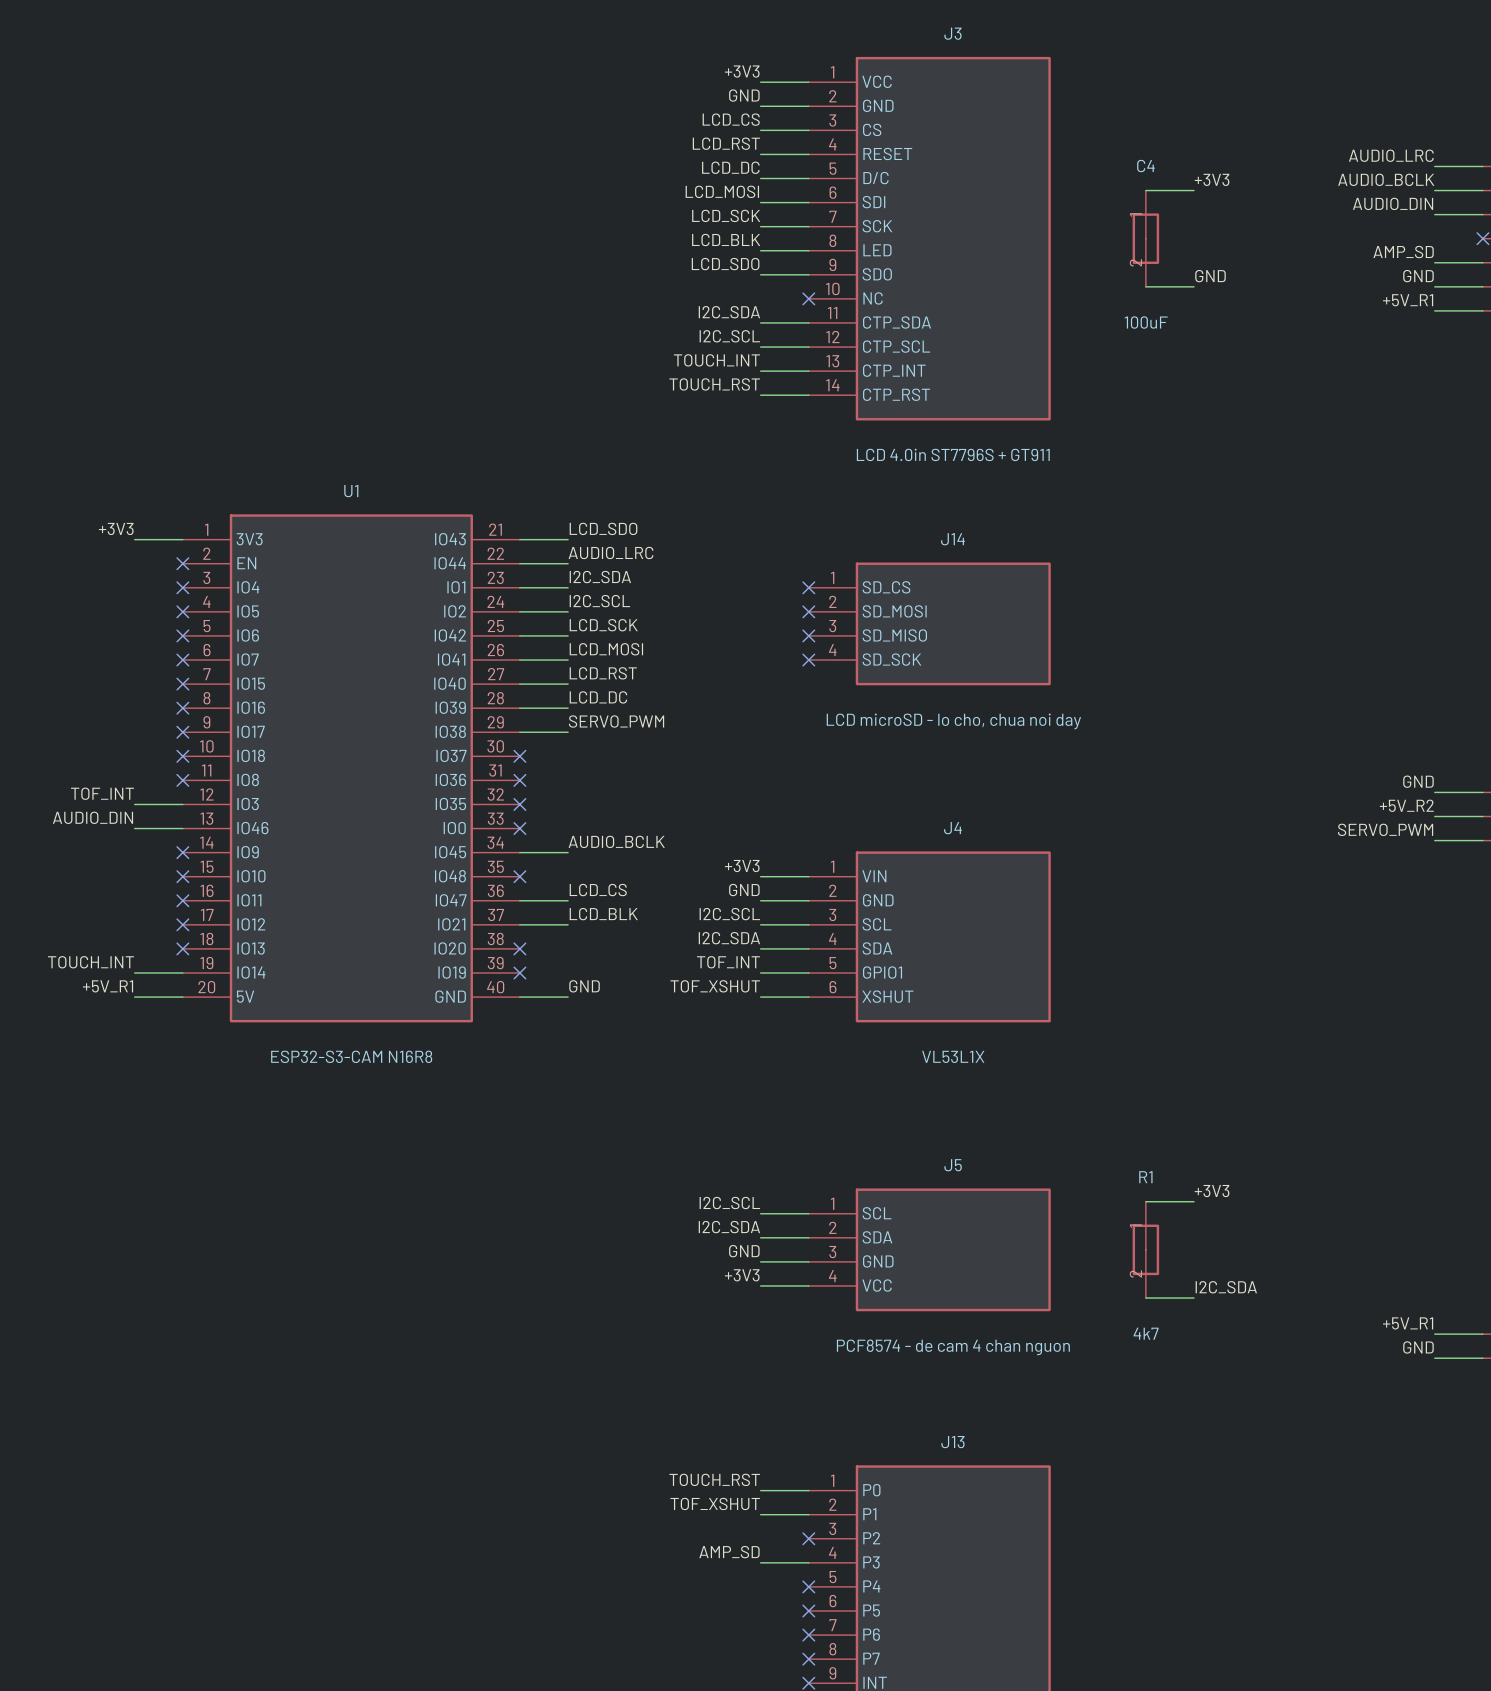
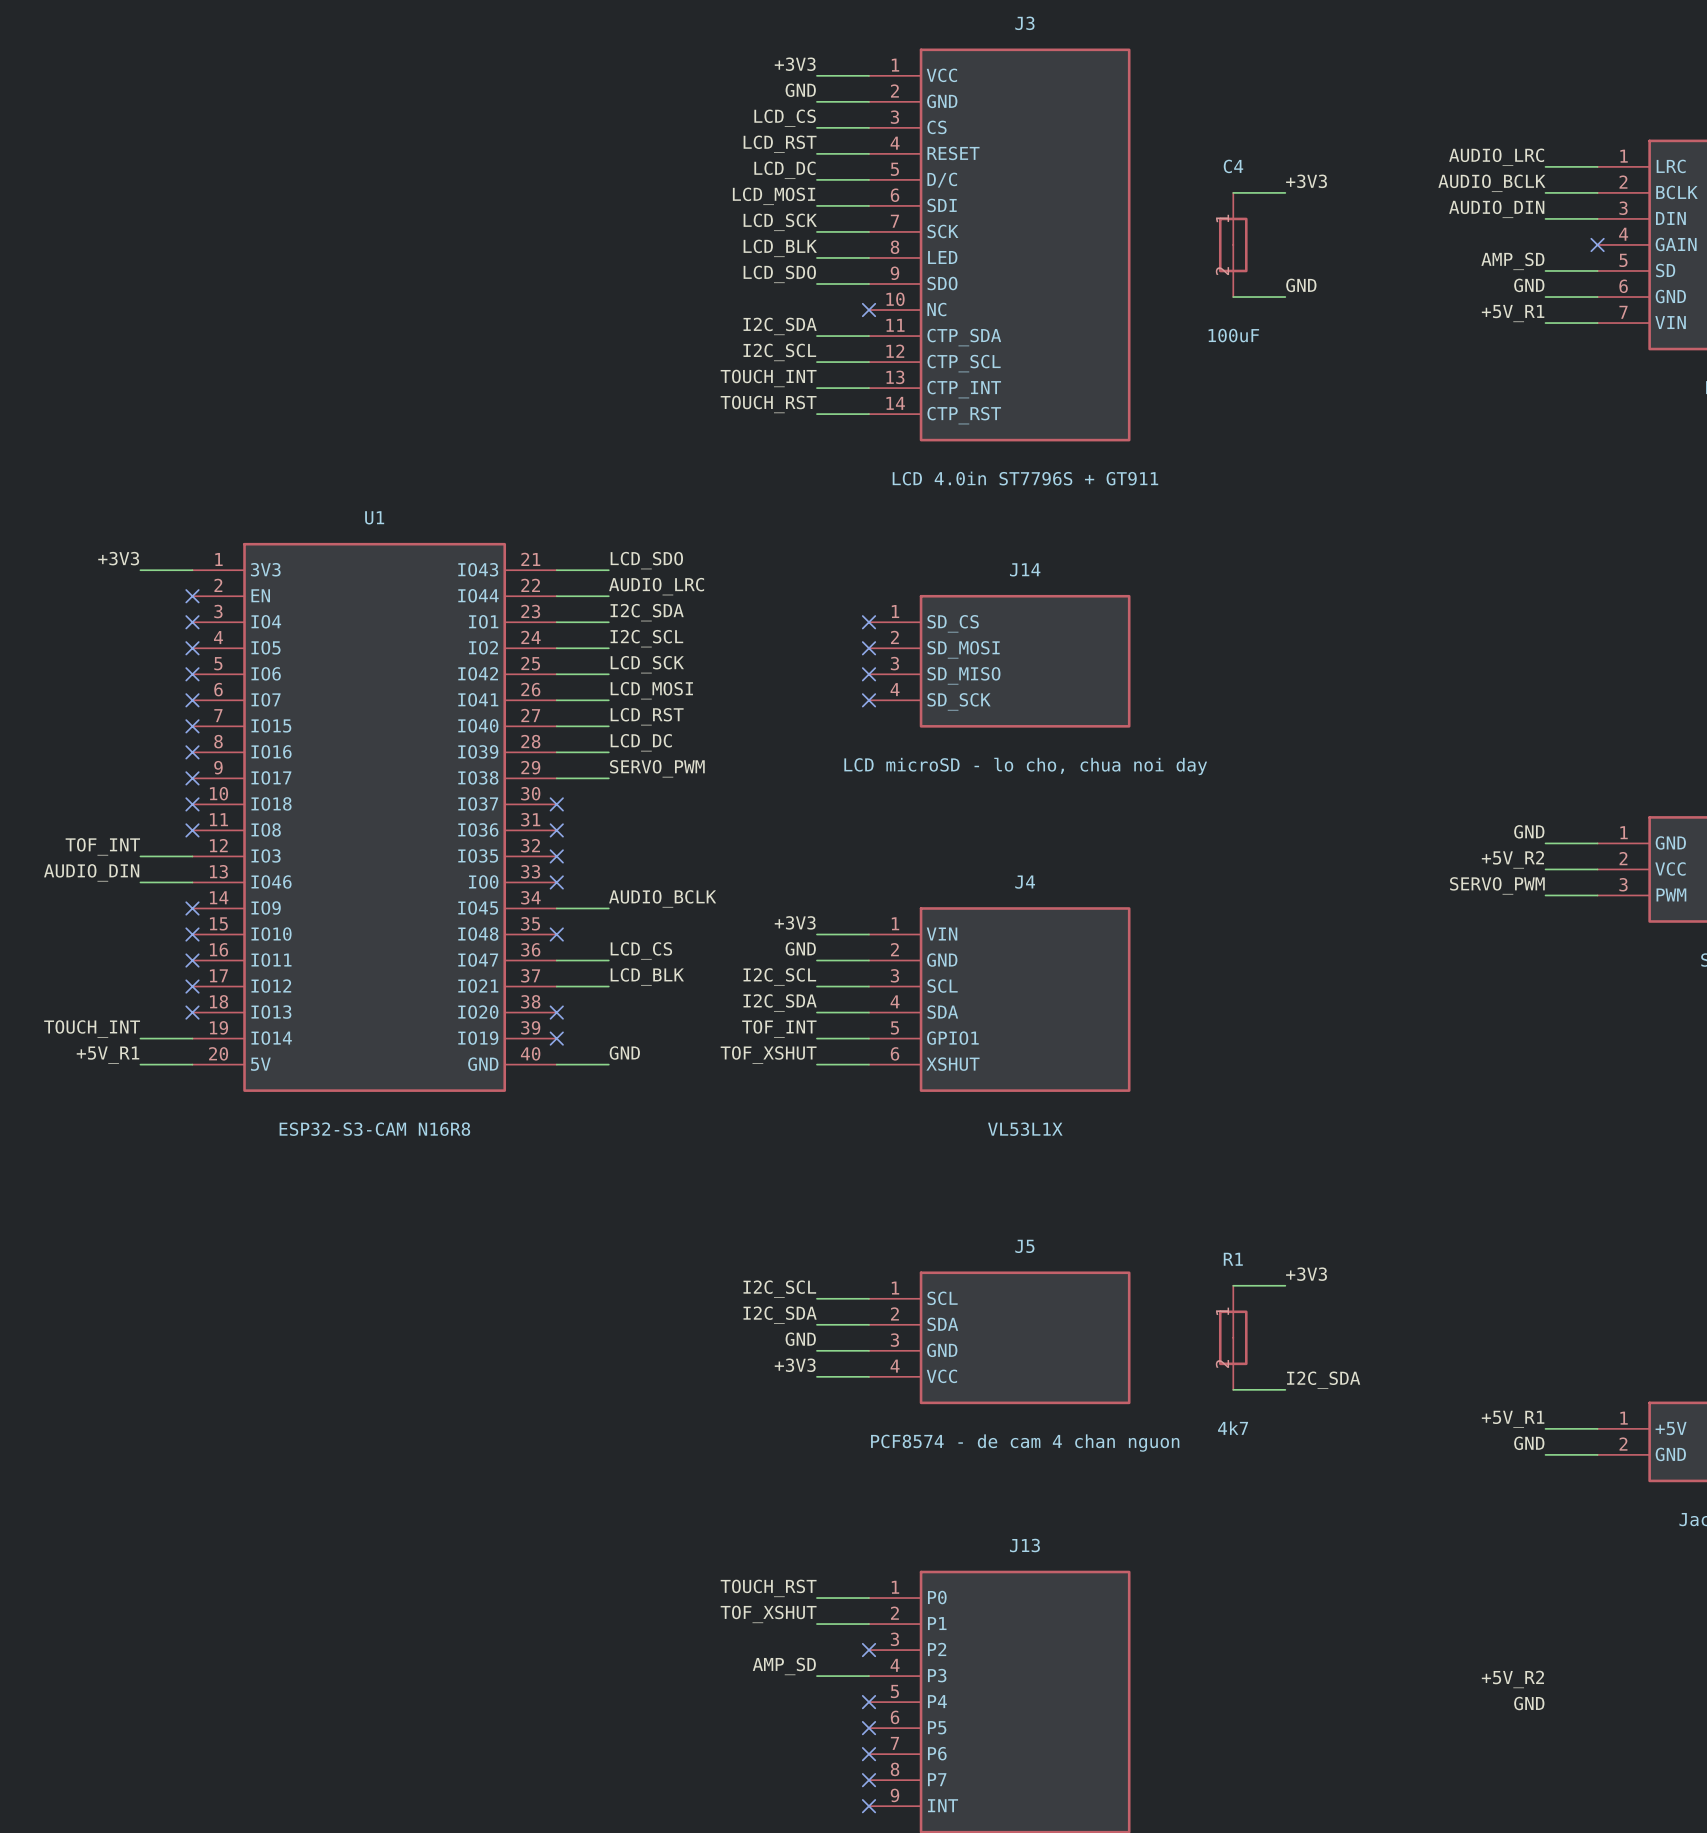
label: none -> +5V_R2 (1512, 1679)
label: none -> GND (1529, 1703)

